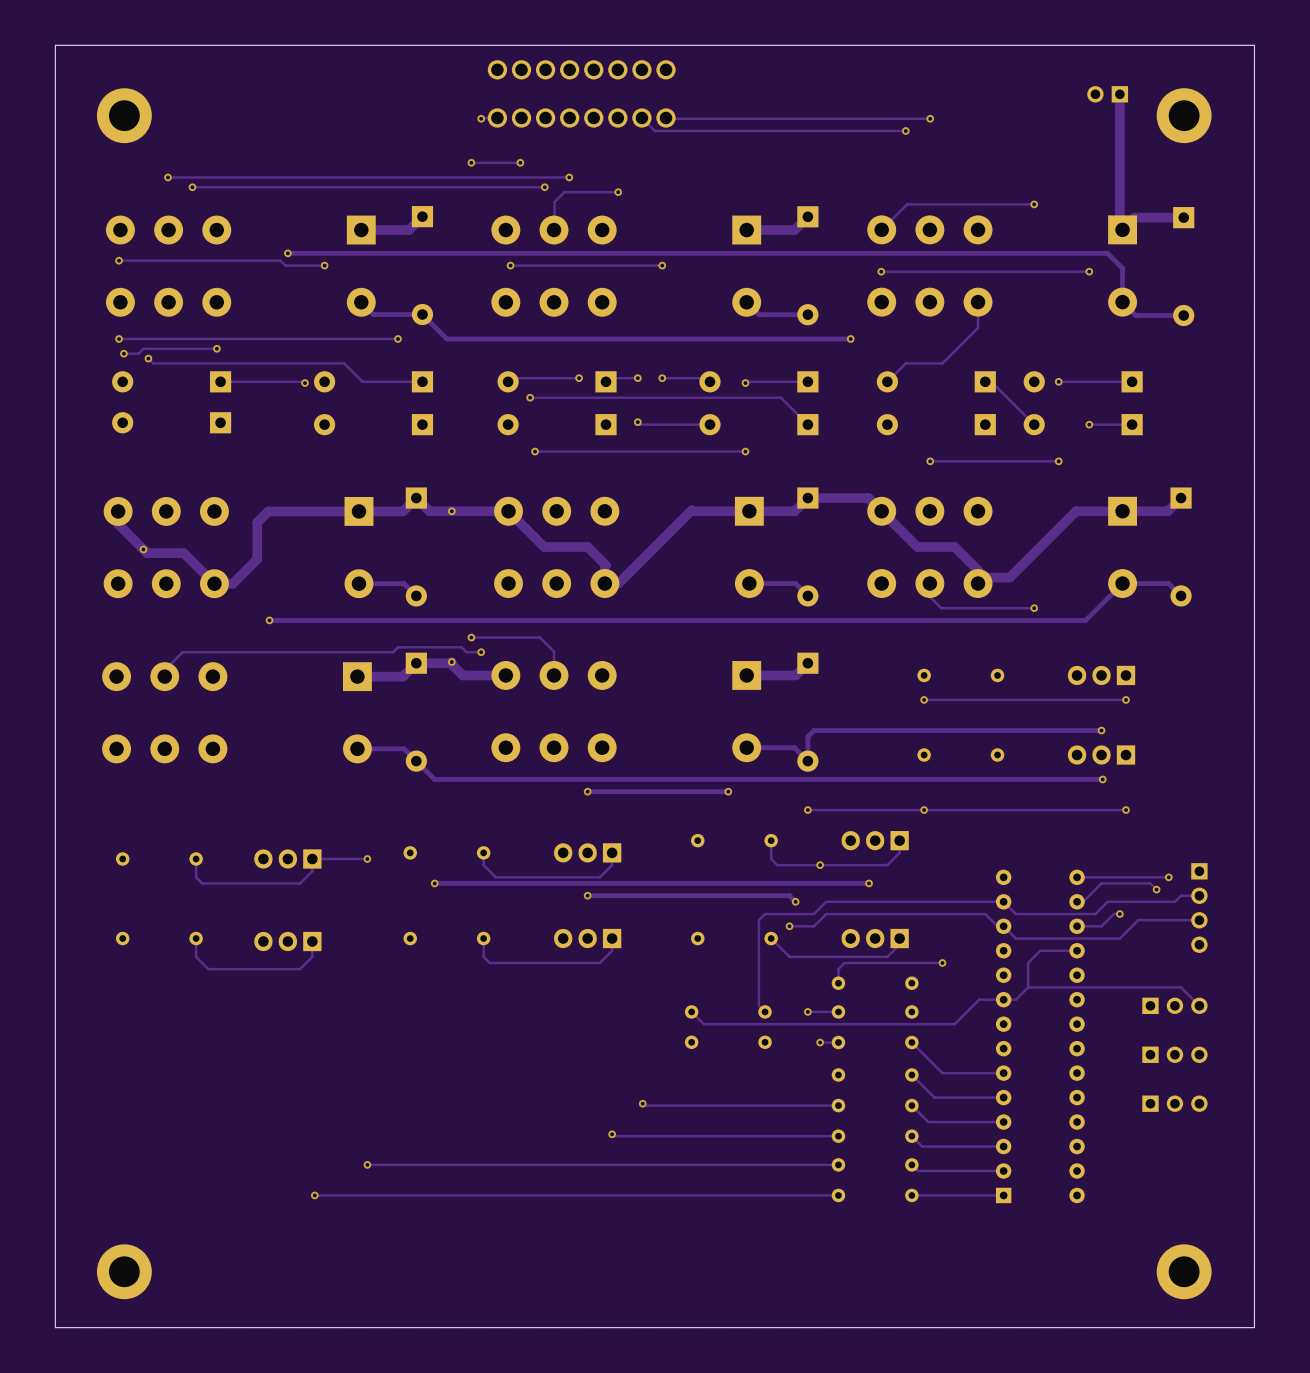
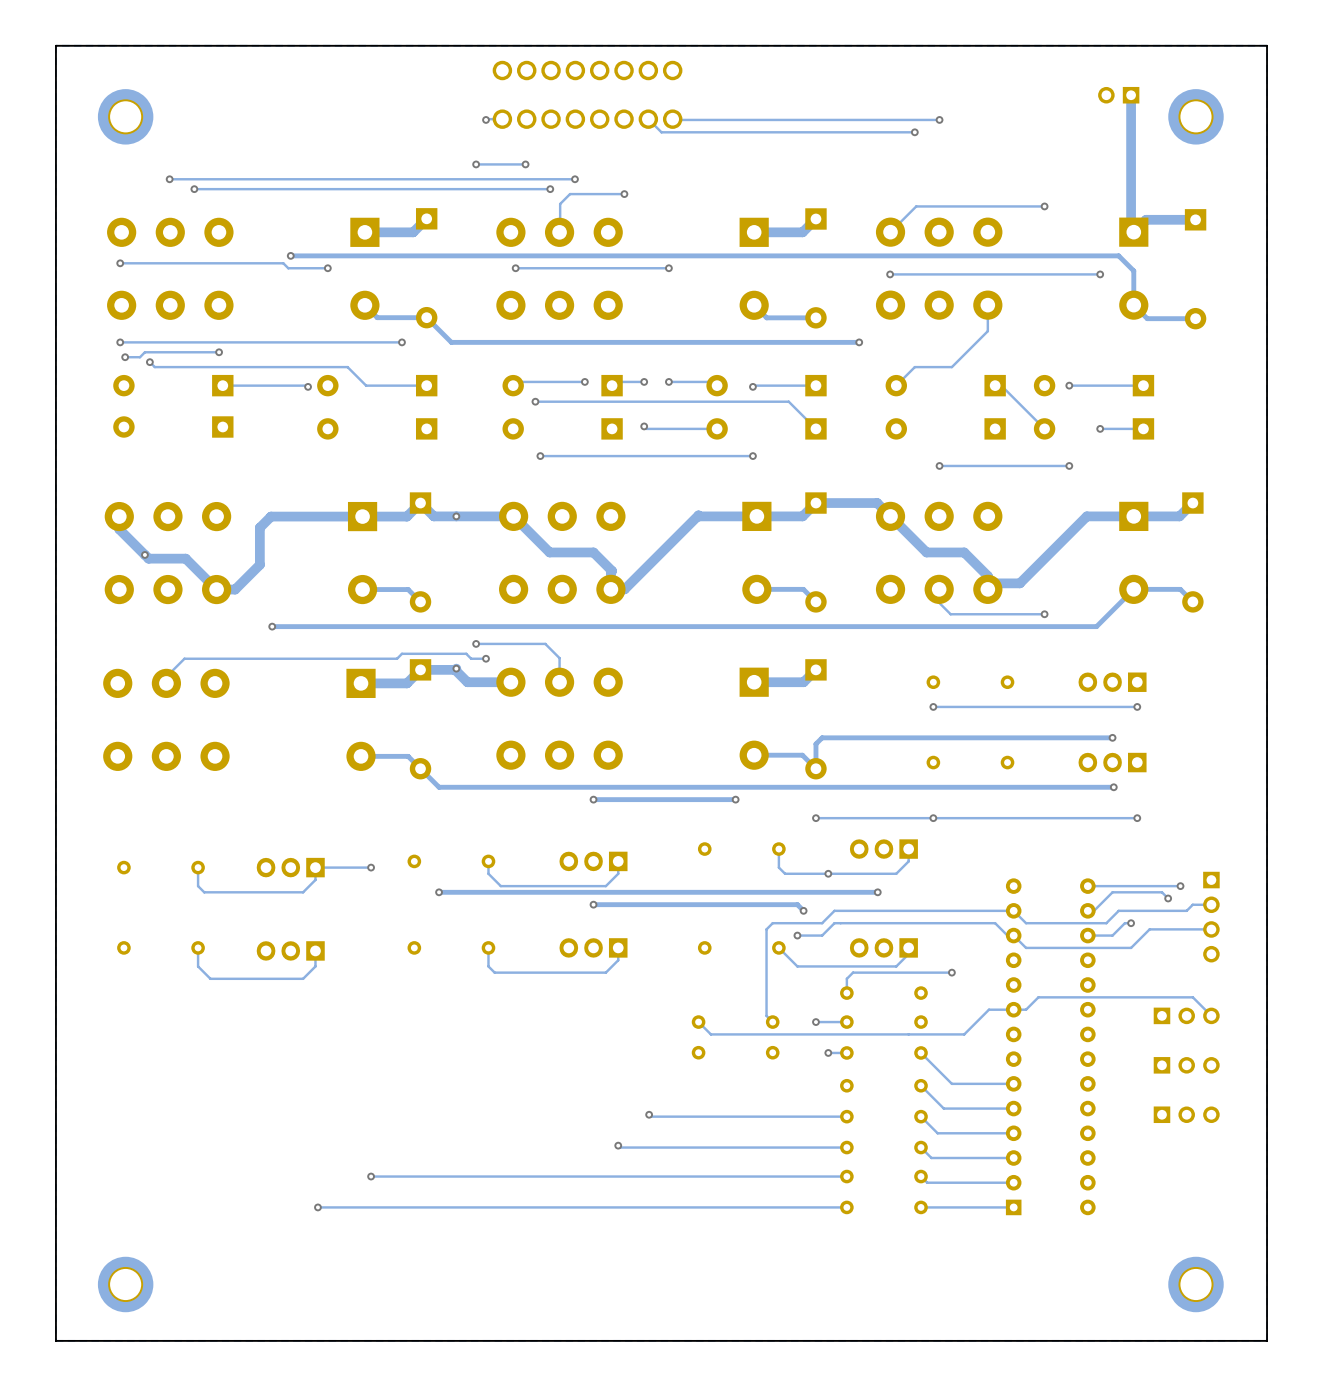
track: (1077, 950) (1040, 950) (1028, 962) (1028, 987) -> none

